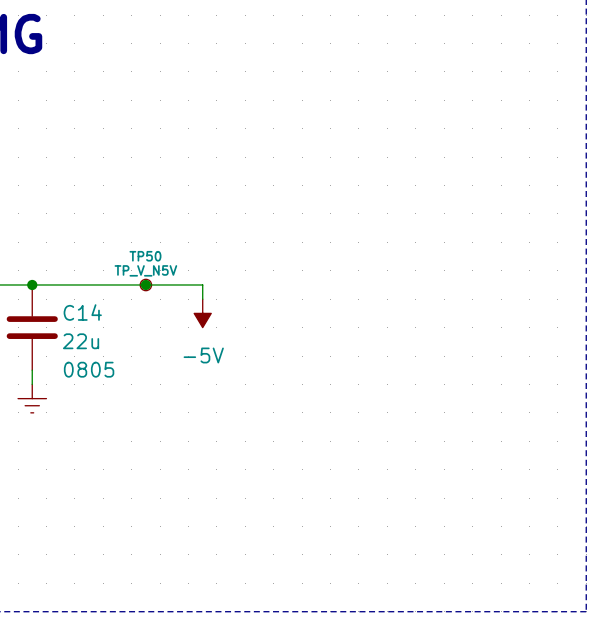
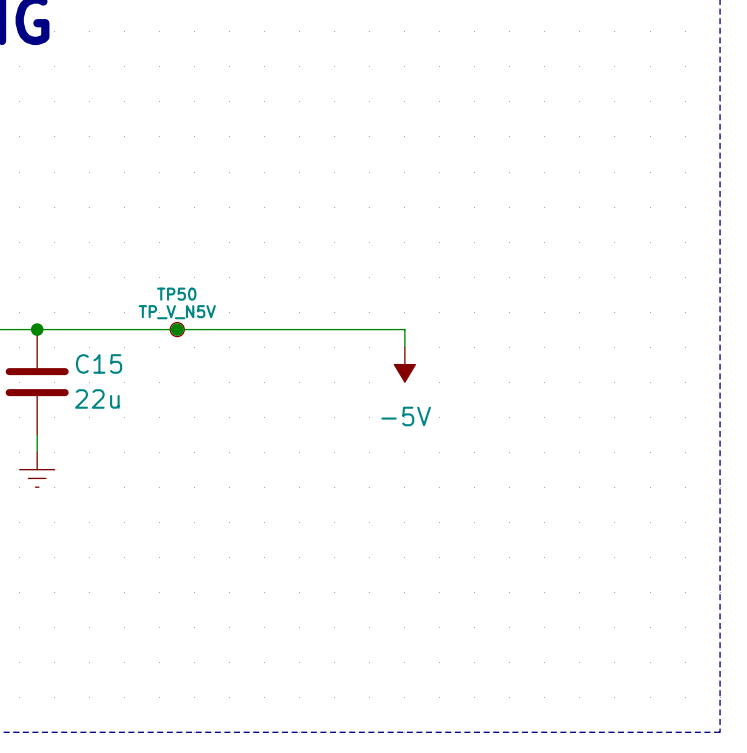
wire: (202, 284) (202, 299) -> (247, 329) (404, 329) (404, 347)
C14 name: C14 (82, 312) -> C15 (99, 363)
power symbol position: -5V (202, 313) -> -5V (404, 364)
C14 text: 0805 (89, 369) -> none

